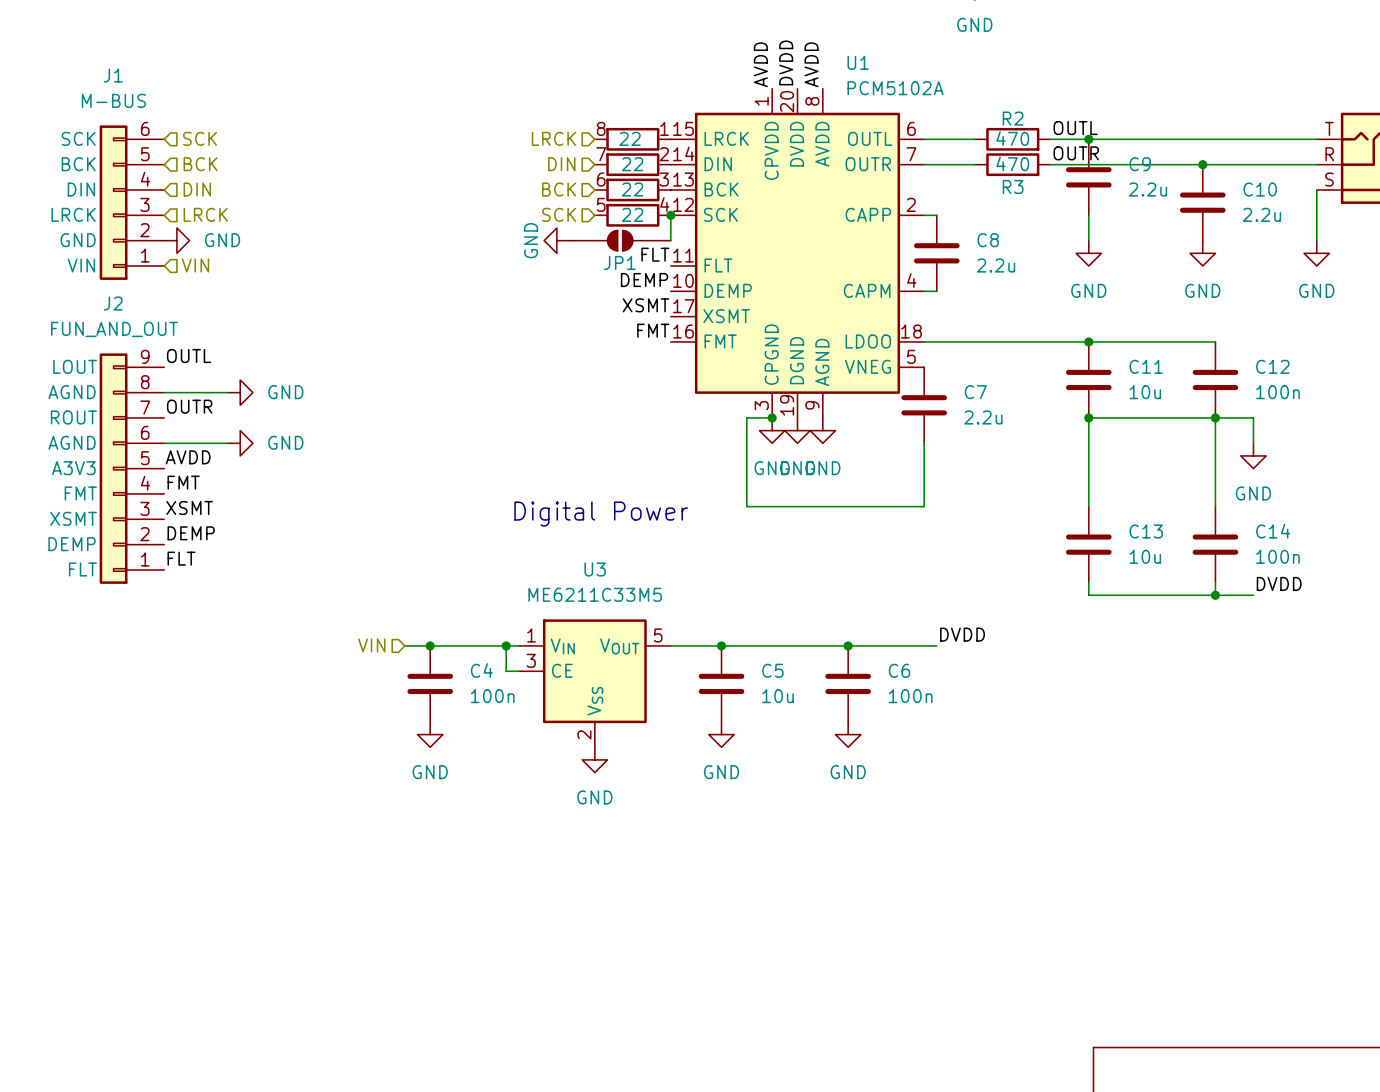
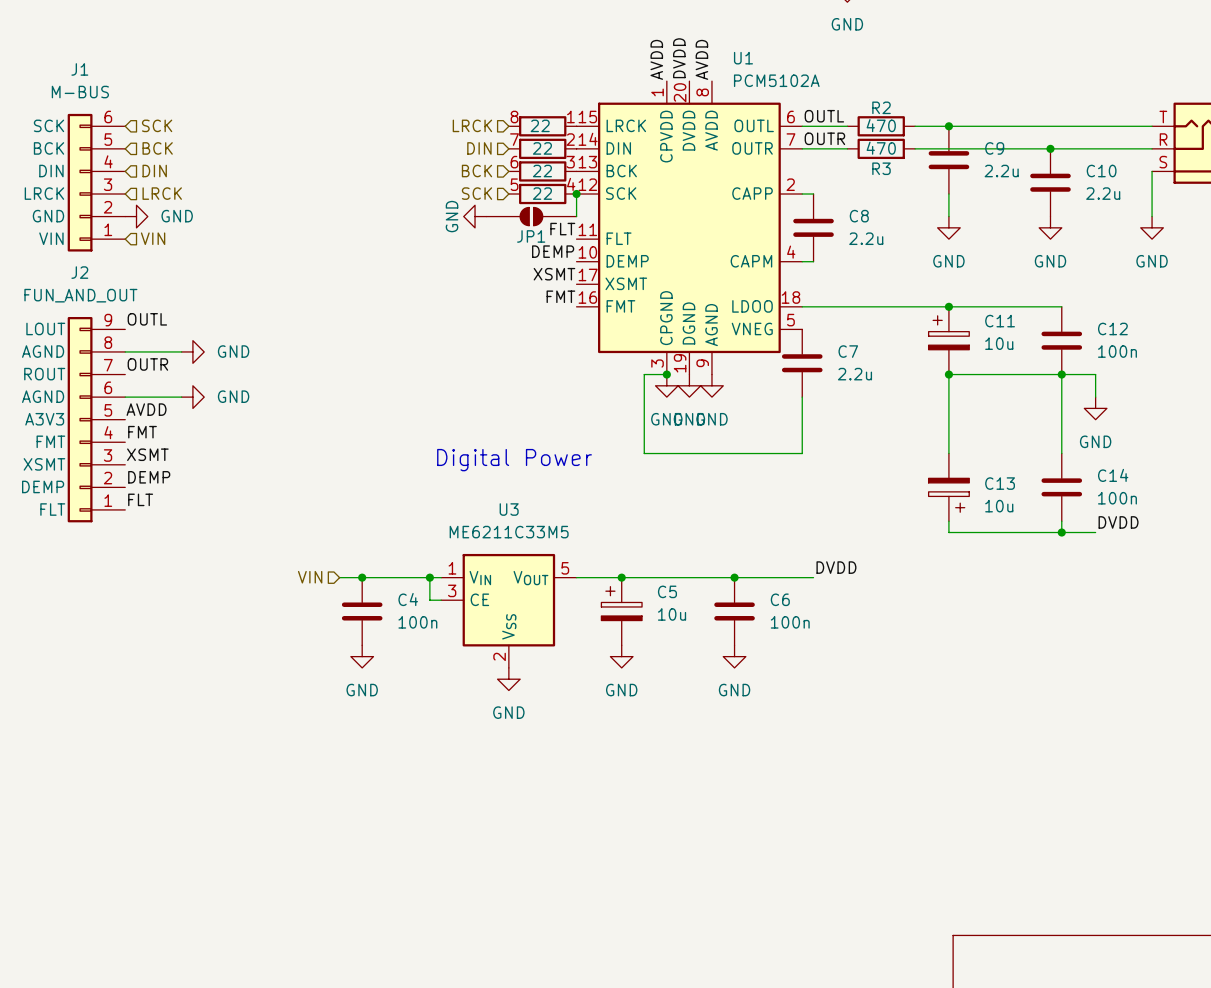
label position: OUTL (1075, 128) -> OUTL (824, 116)
label position: OUTR (1076, 153) -> OUTR (824, 138)
C11 symbol: [1066, 341, 1112, 418] -> [928, 306, 970, 375]
C13 symbol: [1066, 506, 1112, 583] -> [928, 453, 970, 522]
C5 symbol: [698, 645, 745, 722] -> [601, 577, 643, 646]

